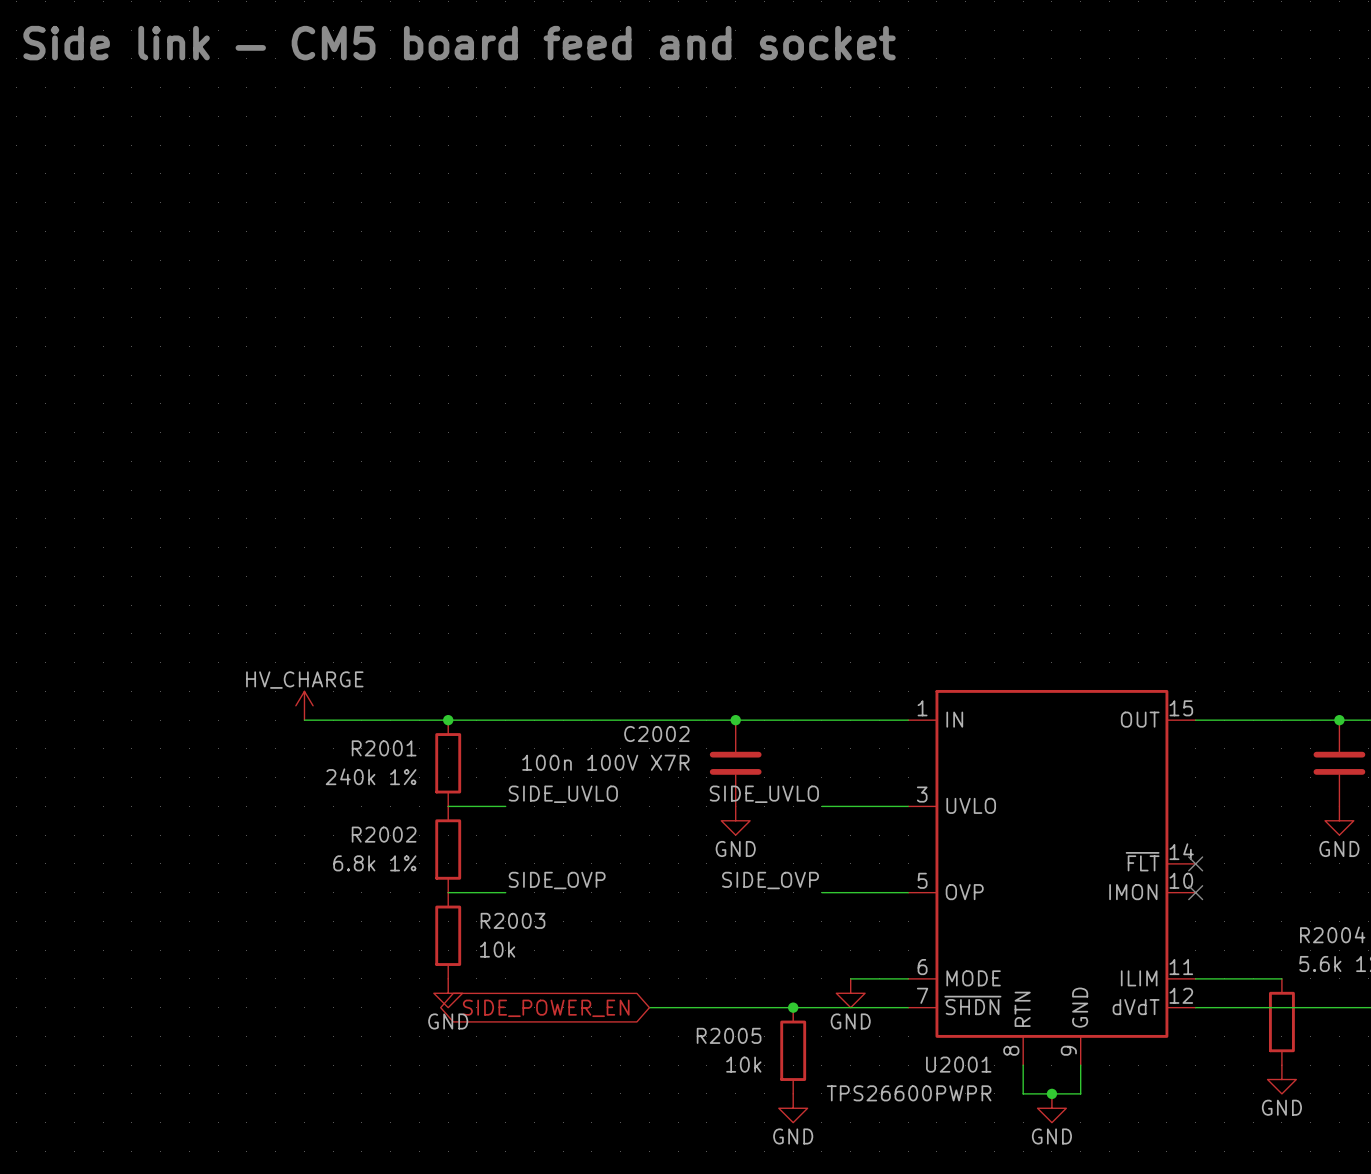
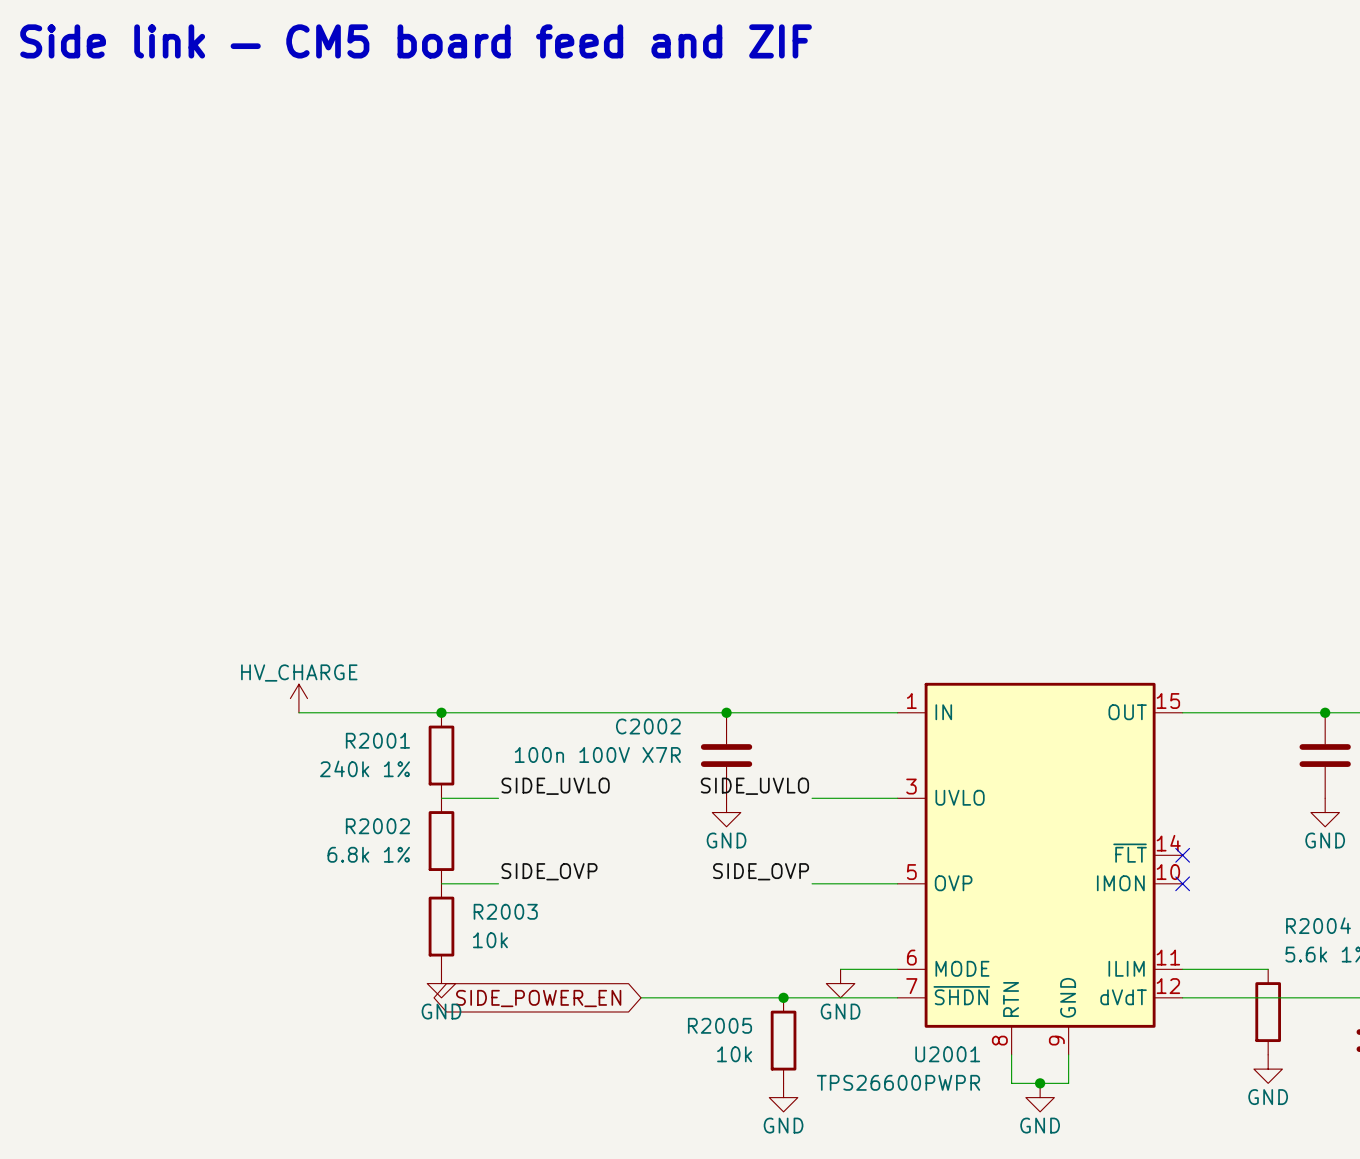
text: Side link — CM5 board feed and socket (459, 43) -> Side link — CM5 board feed and ZIF (416, 41)

